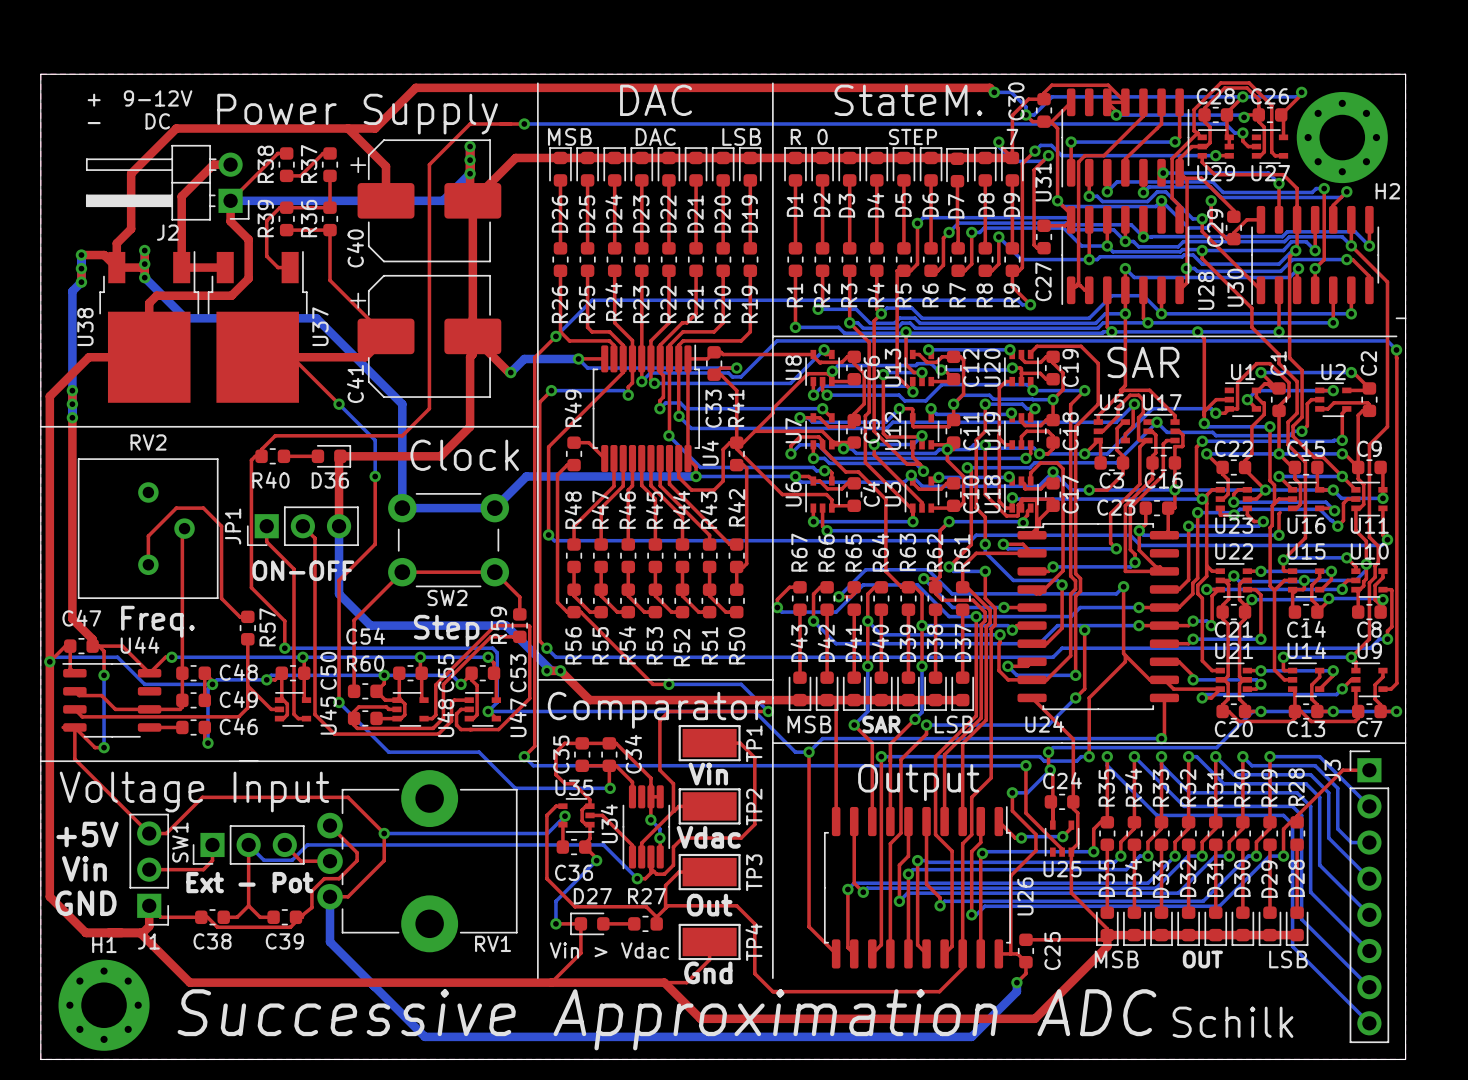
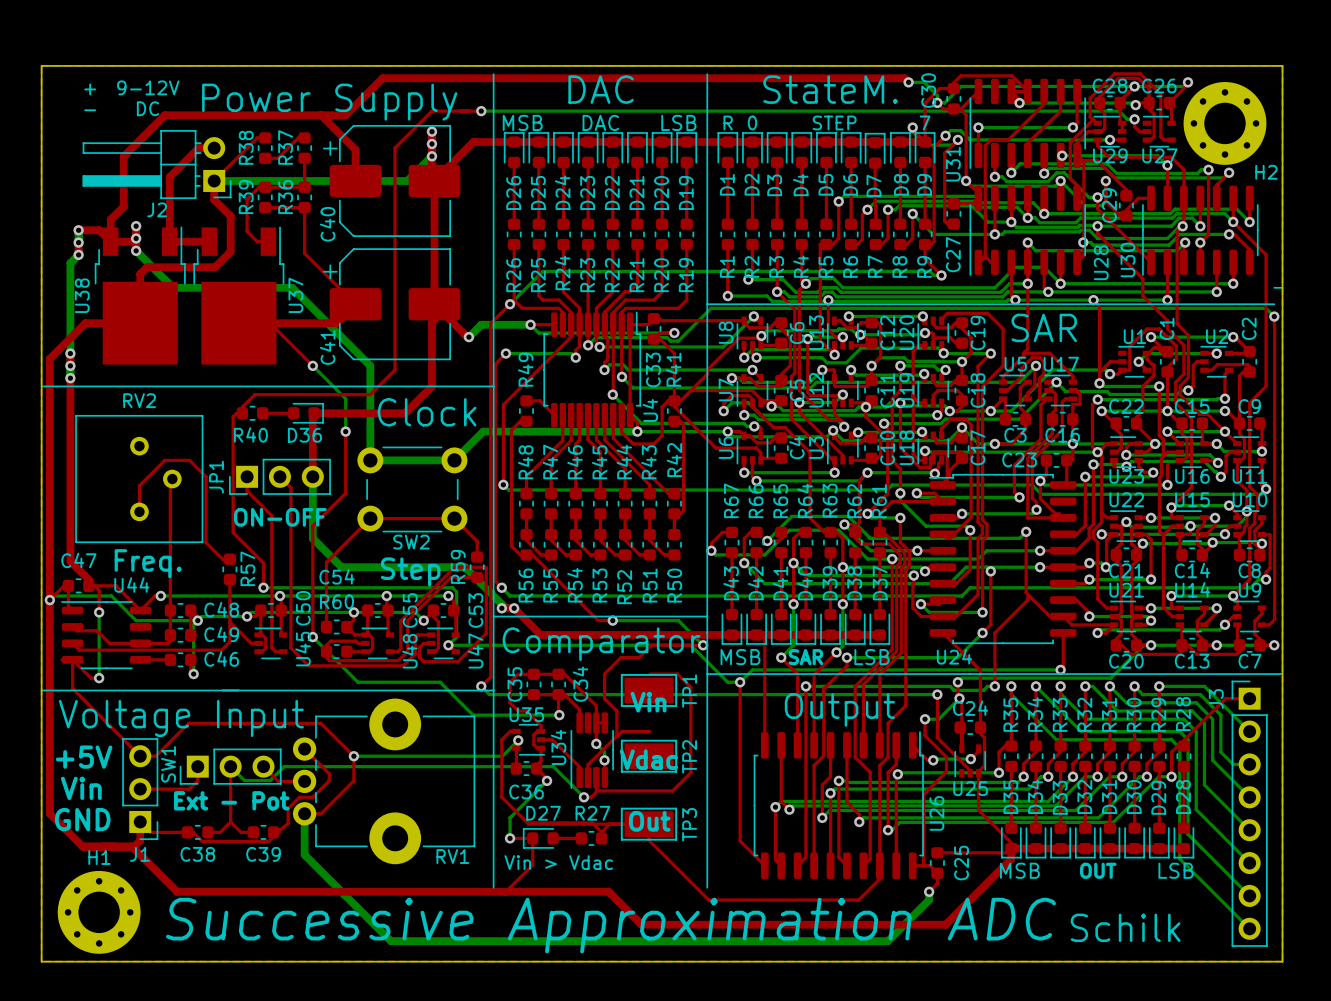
top track: (711, 711) (668, 711) (659, 720) (659, 743) -> (651, 645) (639, 657) (620, 657) (604, 674)
TP1 position: (709, 743) -> (648, 690)
TP2 position: (709, 806) -> (648, 756)
top track: (754, 824) (741, 838) (682, 838) (673, 847) (673, 865) (664, 874) (656, 874) (654, 871) -> (690, 748) (690, 772) (672, 790) (599, 790)
top track: (709, 872) (679, 872) (665, 885) (665, 908) (668, 905) (736, 905) (754, 923) (754, 973) (774, 991) -> (527, 822) (648, 824) (648, 840) (708, 900)
TP3 position: (709, 872) -> (648, 824)
top track: (709, 941) (709, 959) (686, 982) (664, 982) -> none
TP4: (709, 941) -> none
text: Gnd (708, 972) -> none

